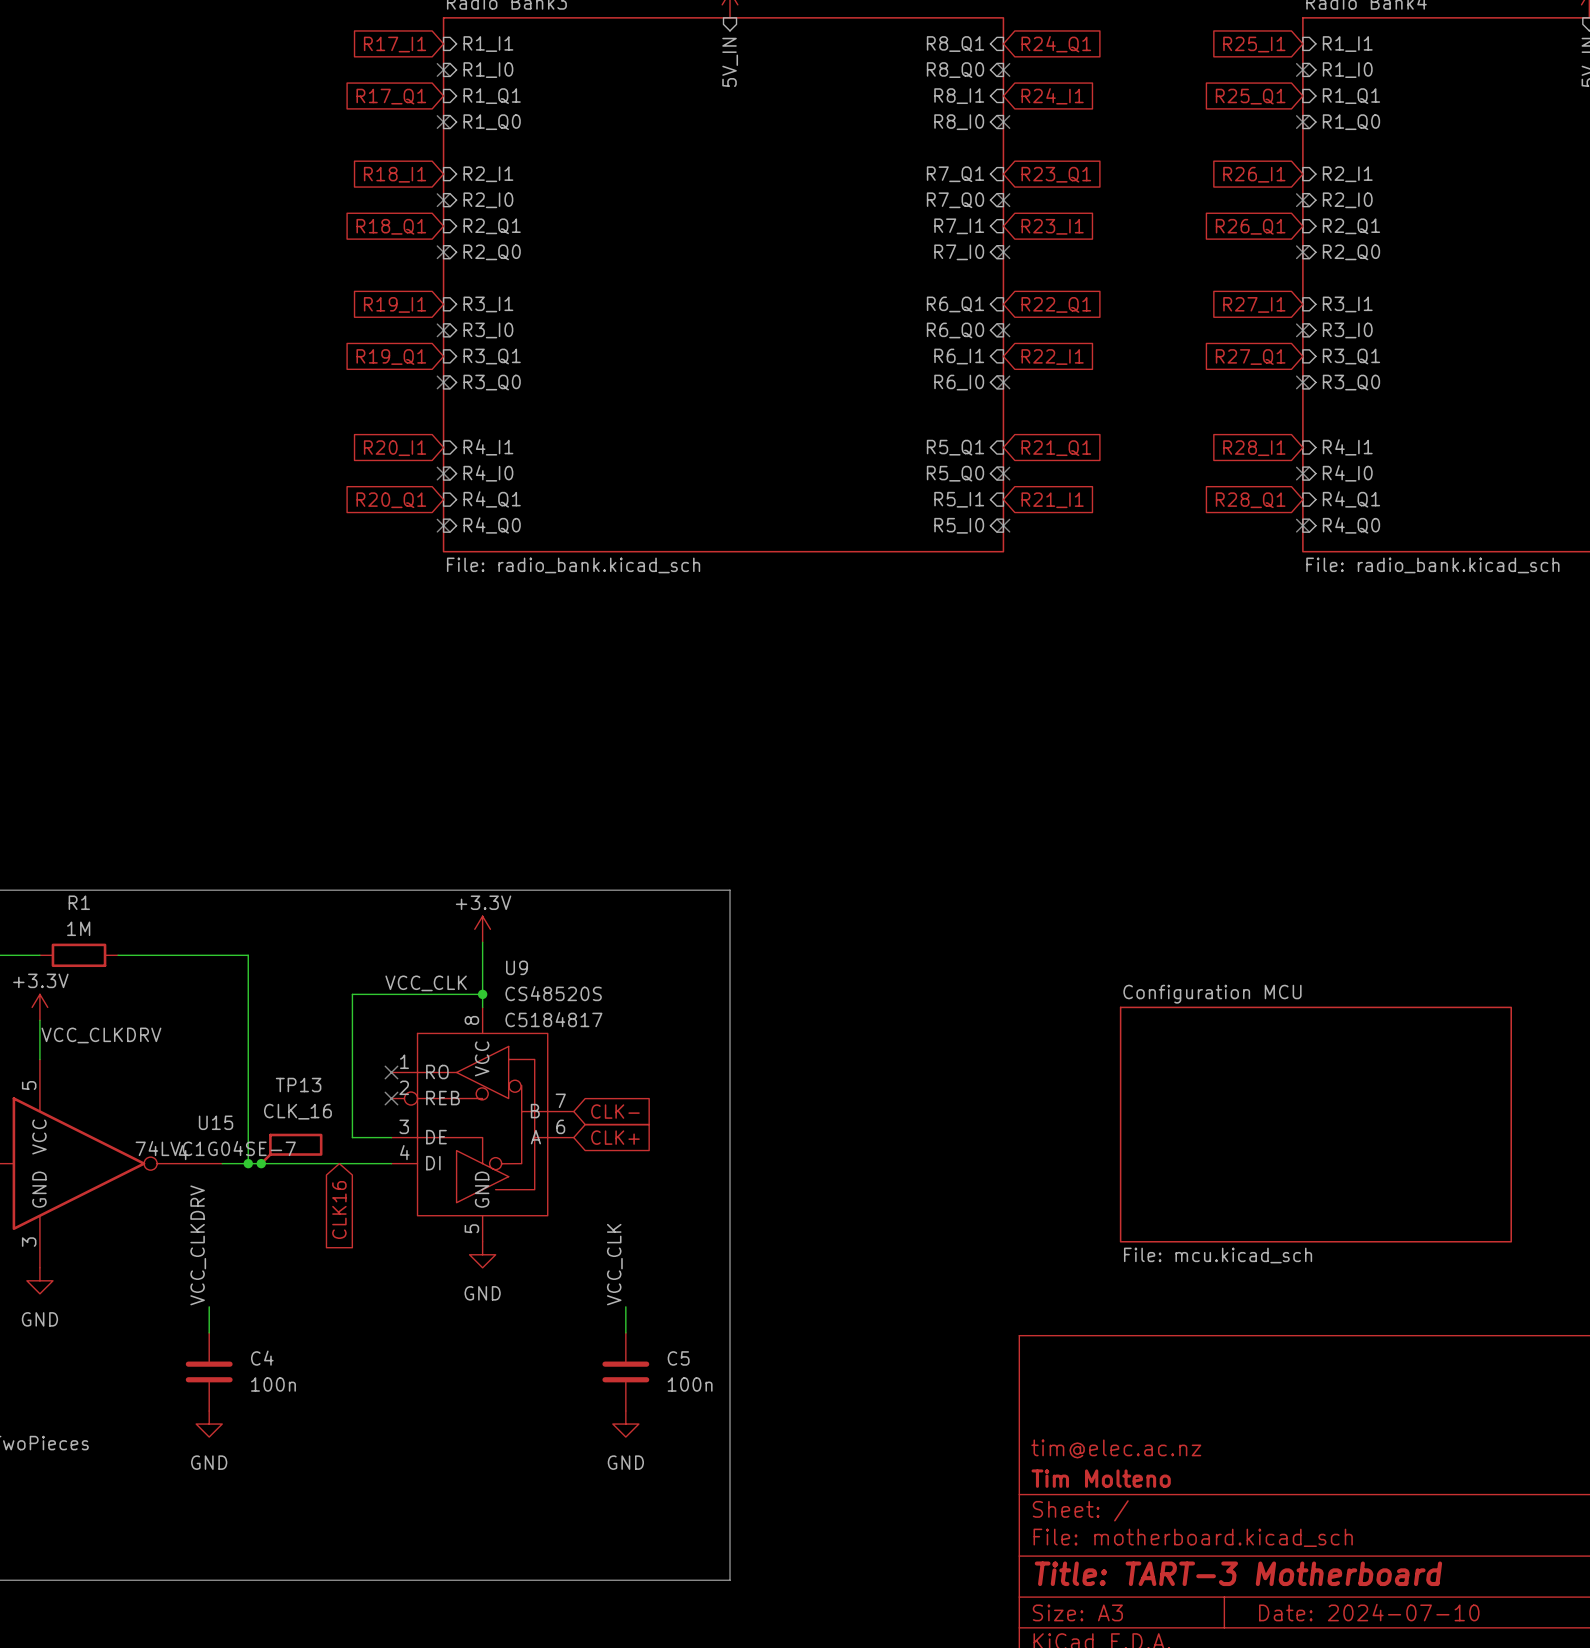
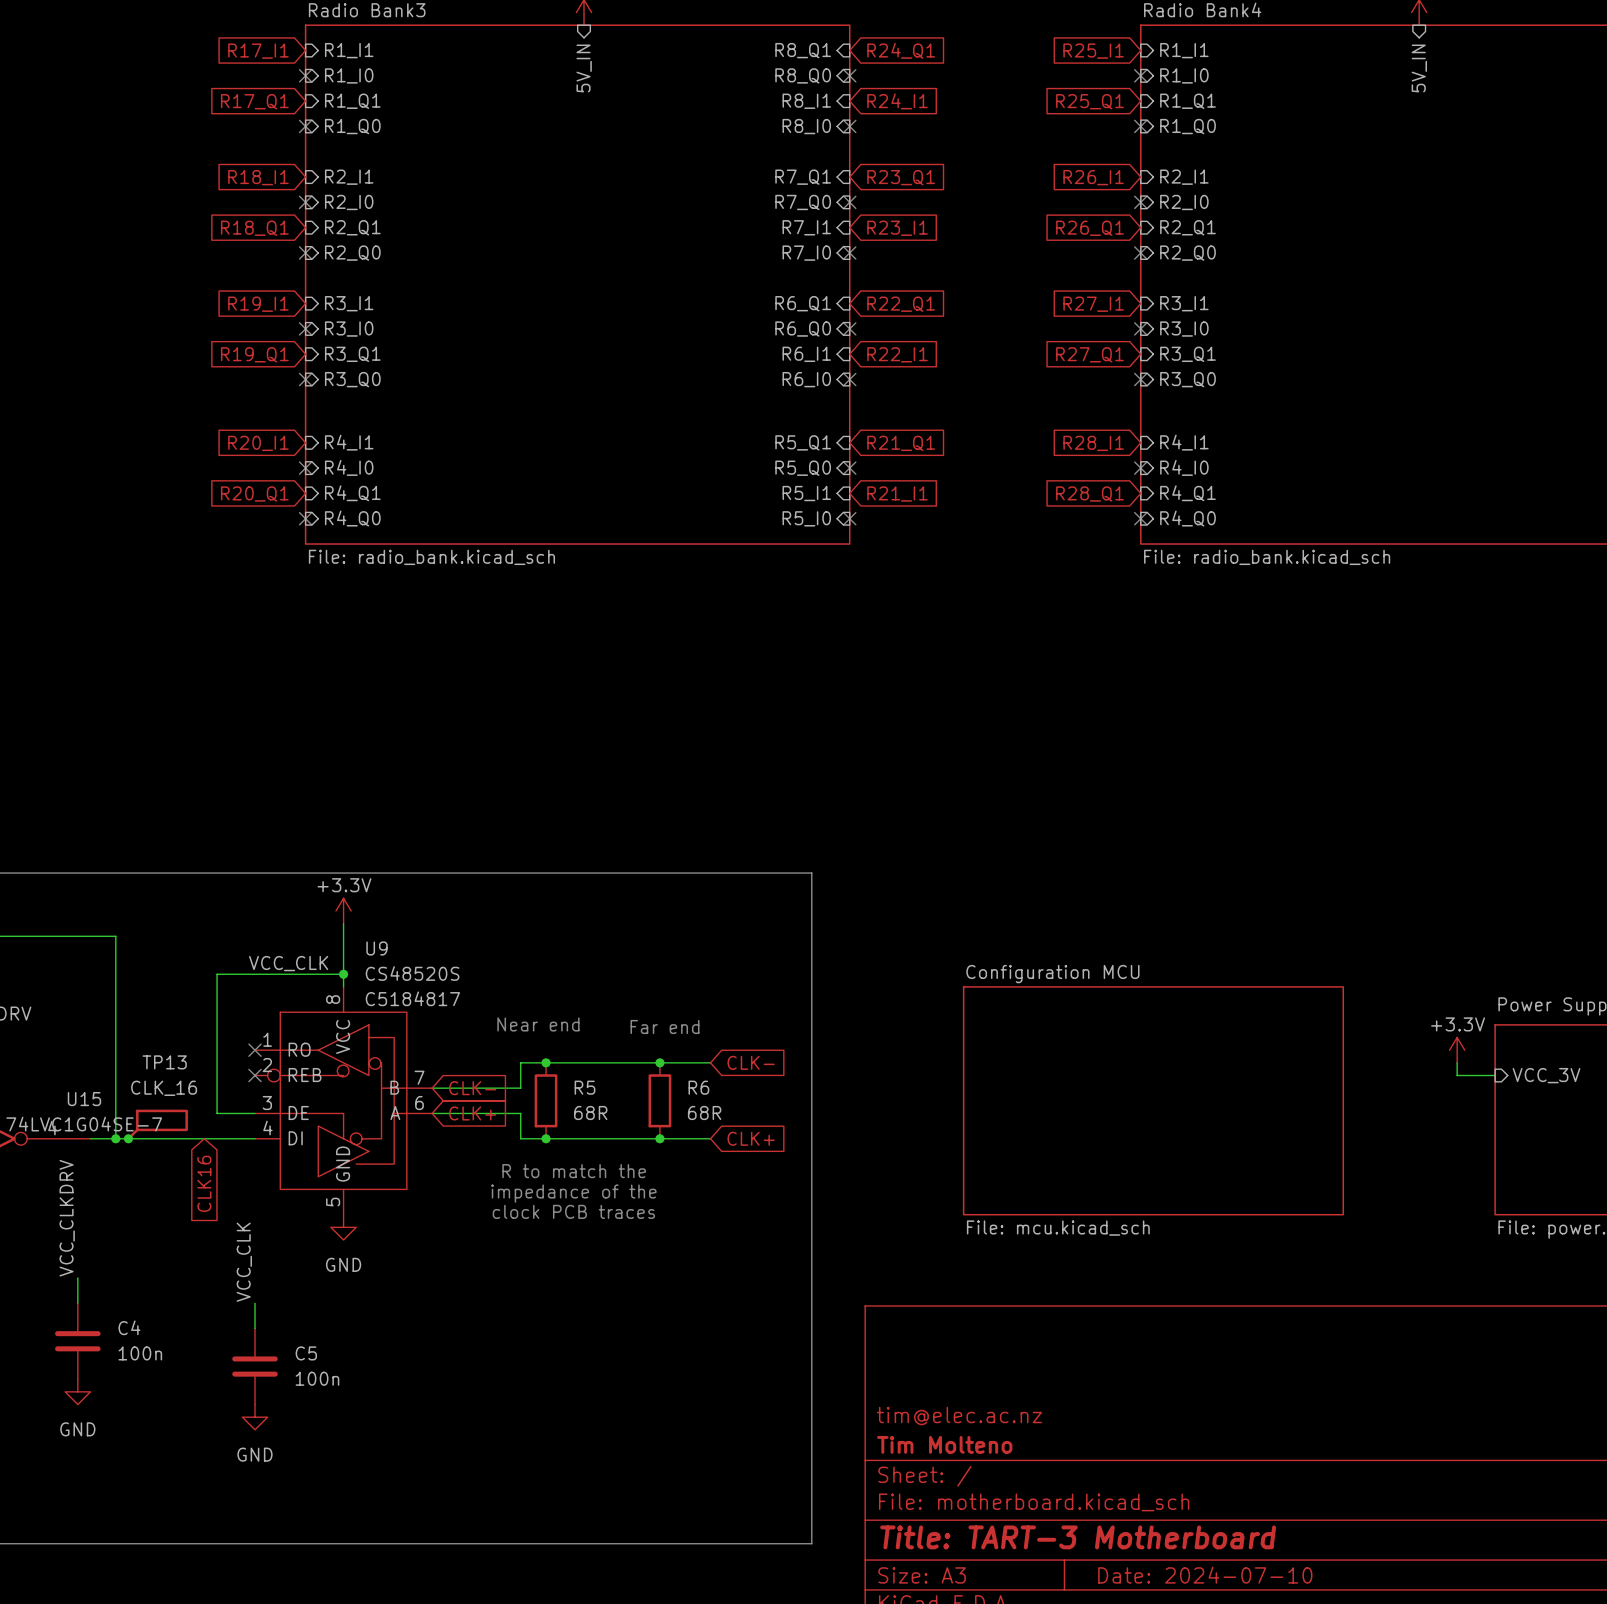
line: (730, 890) (730, 1580) -> (584, 873) (811, 873) (811, 1543) (584, 1543)
text: none -> Near end (538, 1024)
text: none -> Far end (664, 1026)
junction: none -> (546, 1062)
junction: none -> (659, 1062)
wire: none -> (710, 1062) (520, 1062) (520, 1088) (432, 1088)
global label: none -> CLK- (751, 1062)
R5: none -> 68R (546, 1100)
R6: none -> 68R (659, 1100)
wire: none -> (432, 1113) (520, 1113) (520, 1138) (710, 1138)
junction: none -> (546, 1138)
junction: none -> (659, 1138)
global label: none -> CLK+ (751, 1138)
text: none -> R to match the (574, 1171)
text: none -> impedance of the (573, 1193)
text: none -> clock PCB traces (573, 1211)
label position: VCC_CLK (614, 1264) -> VCC_CLK (244, 1262)
wire: (625, 1306) (625, 1332) -> (254, 1303) (254, 1328)
C5 position: (625, 1371) -> (254, 1366)
power symbol position: GND (625, 1424) -> GND (254, 1417)

